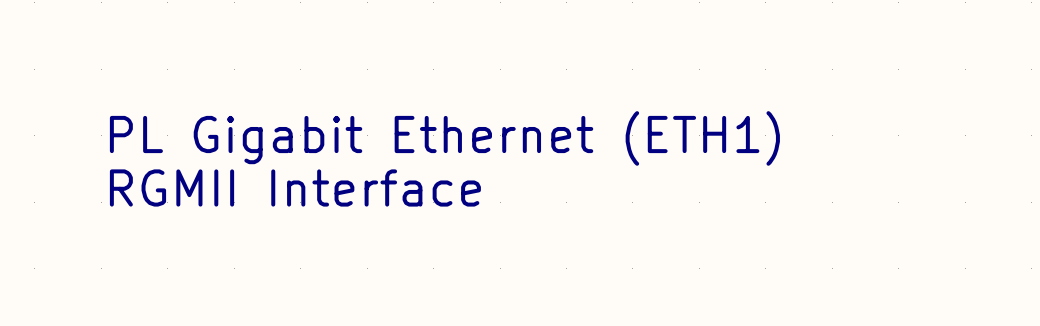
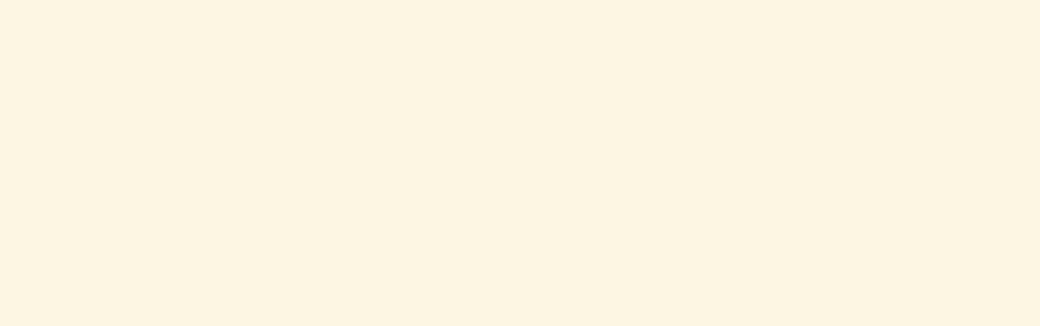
text: PL Gigabit Ethernet (ETH1) (444, 138) -> none
text: RGMII Interface (295, 187) -> none

